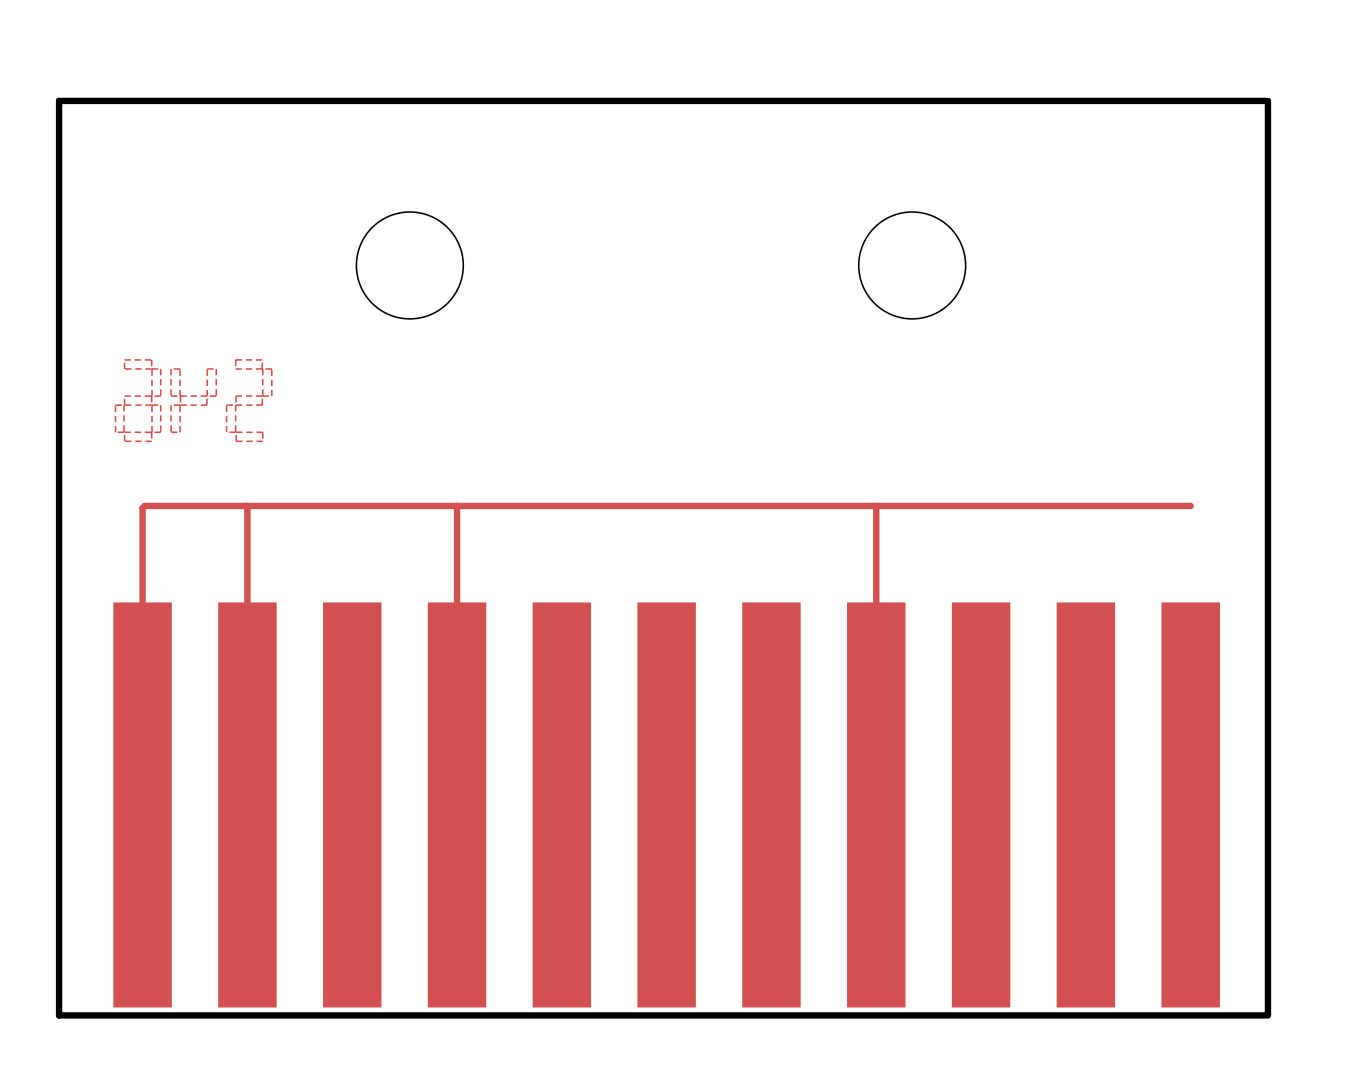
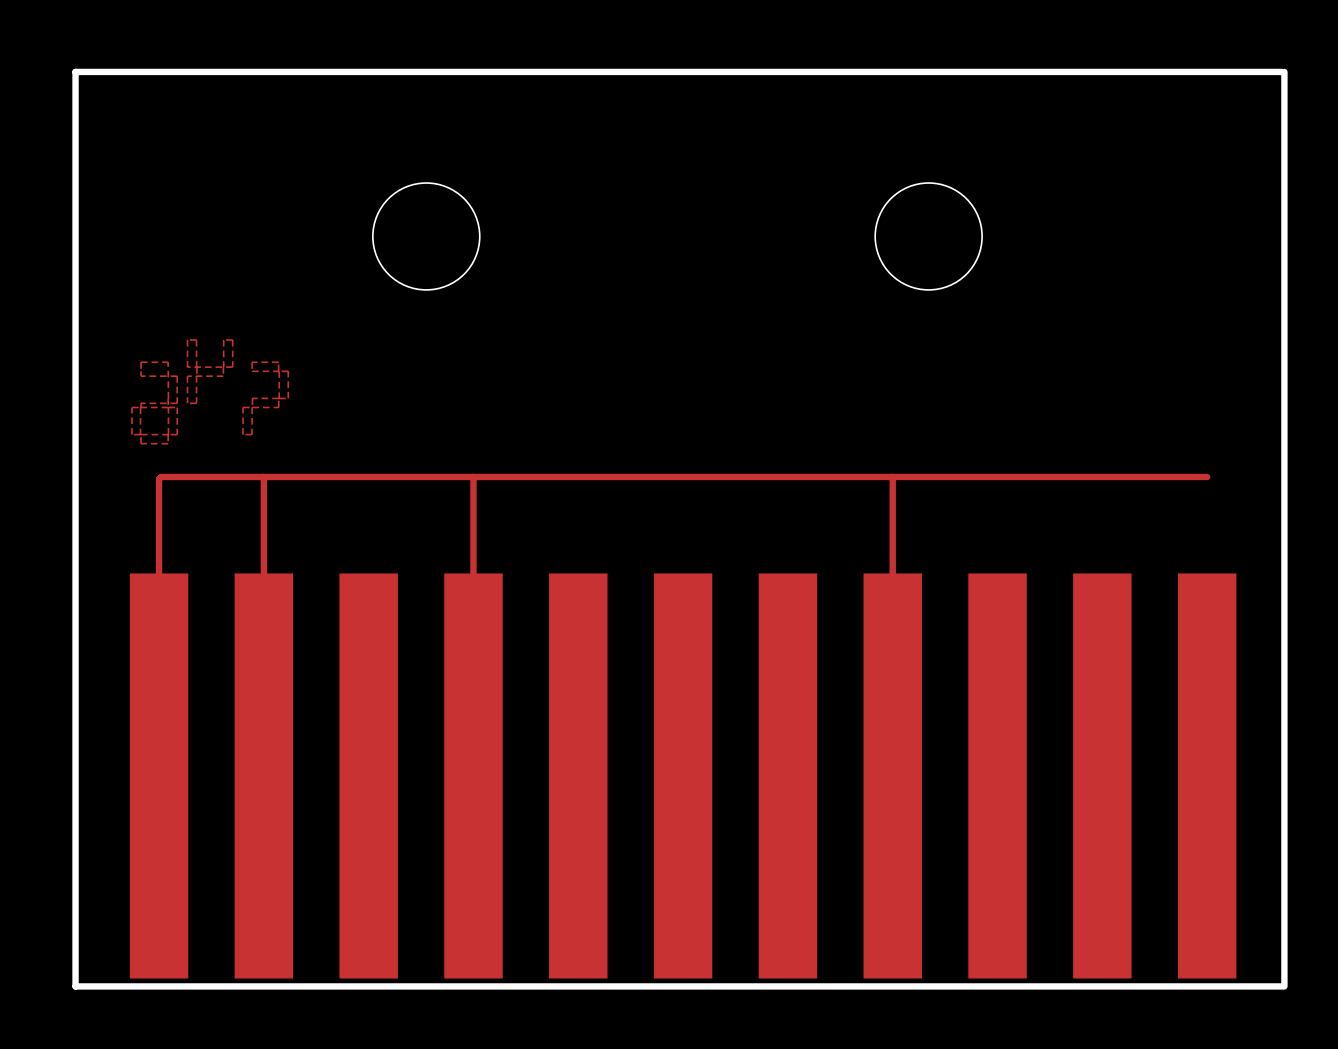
top zone outline: (262, 359) (262, 368) (235, 368) (235, 359) (262, 359) -> (278, 362) (278, 371) (252, 371) (252, 362) (278, 362)
top zone outline: (271, 368) (271, 396) (262, 396) (262, 368) (271, 368) -> (288, 371) (288, 398) (279, 398) (279, 371) (288, 371)
top zone outline: (124, 396) (160, 396) (160, 368) (124, 368) (124, 359) (151, 359) (151, 427) -> (141, 367) (141, 362) (168, 362) (168, 398)
top zone outline: (124, 405) (115, 405) (115, 432) (124, 432) (124, 405) -> (140, 407) (131, 407) (131, 434) (140, 434) (140, 407)
top zone outline: (236, 405) (236, 396) (262, 396) (262, 405) (226, 405) (226, 432) (235, 432) (235, 405) -> none
top zone outline: (236, 432) (262, 432) (262, 441) (236, 441) (236, 436) -> (252, 403) (252, 398) (278, 398) (278, 407) (243, 407) (243, 434) (252, 434) (252, 407)
top zone outline: (124, 436) (124, 441) (151, 441) -> (141, 407) (177, 407) (177, 434) (141, 434) (141, 443) (168, 443) (168, 412)

